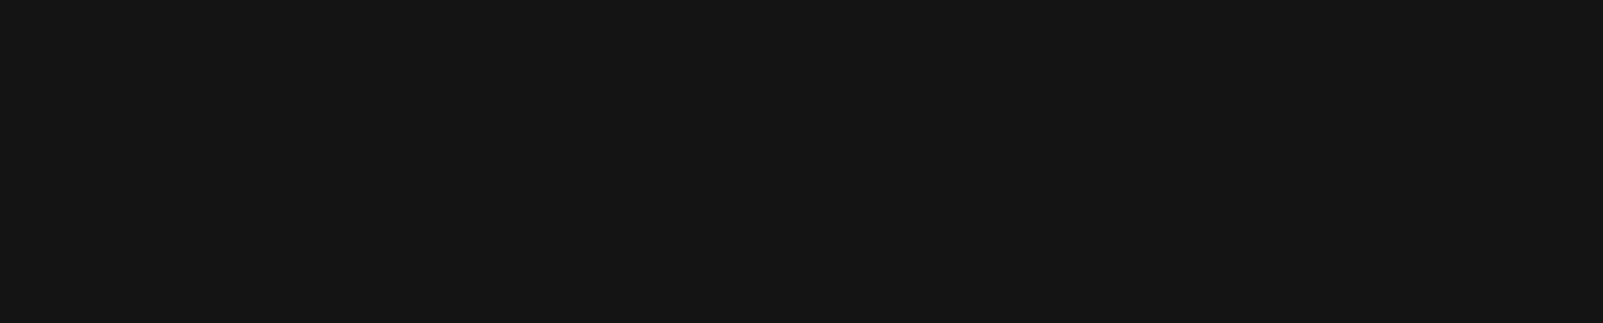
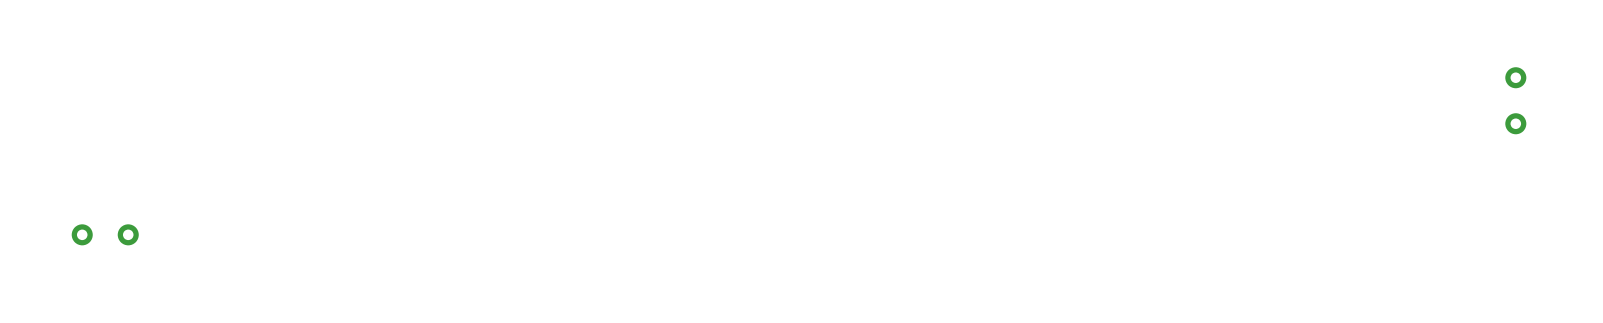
part: none -> (1515, 100)
part: none -> (105, 234)

